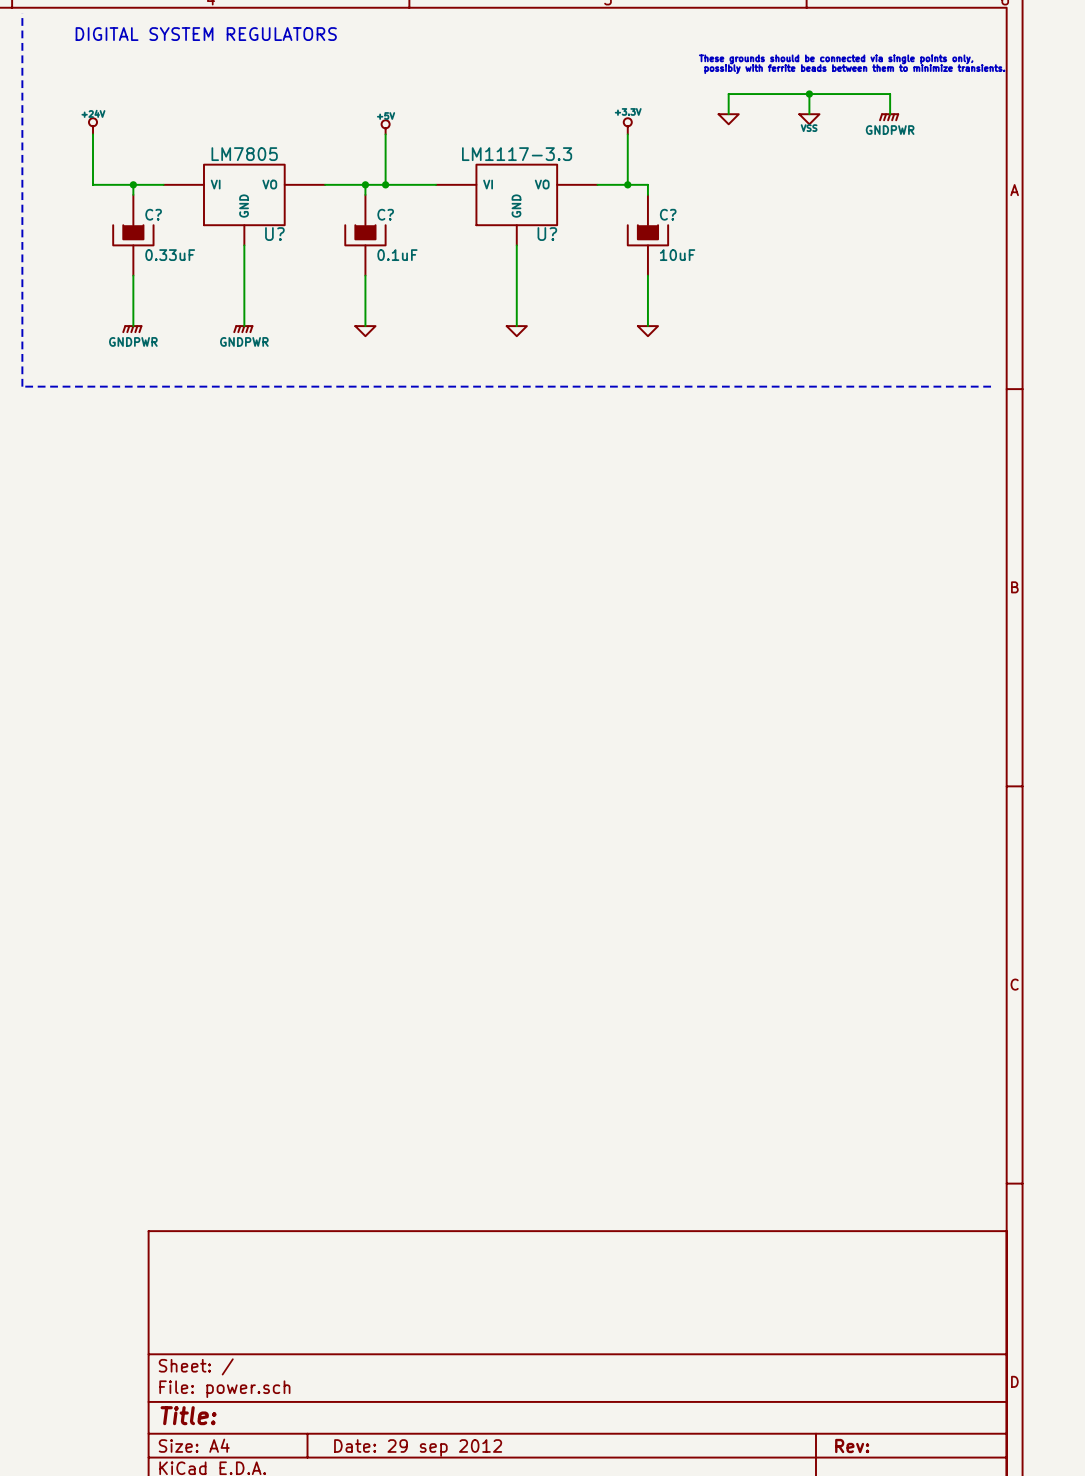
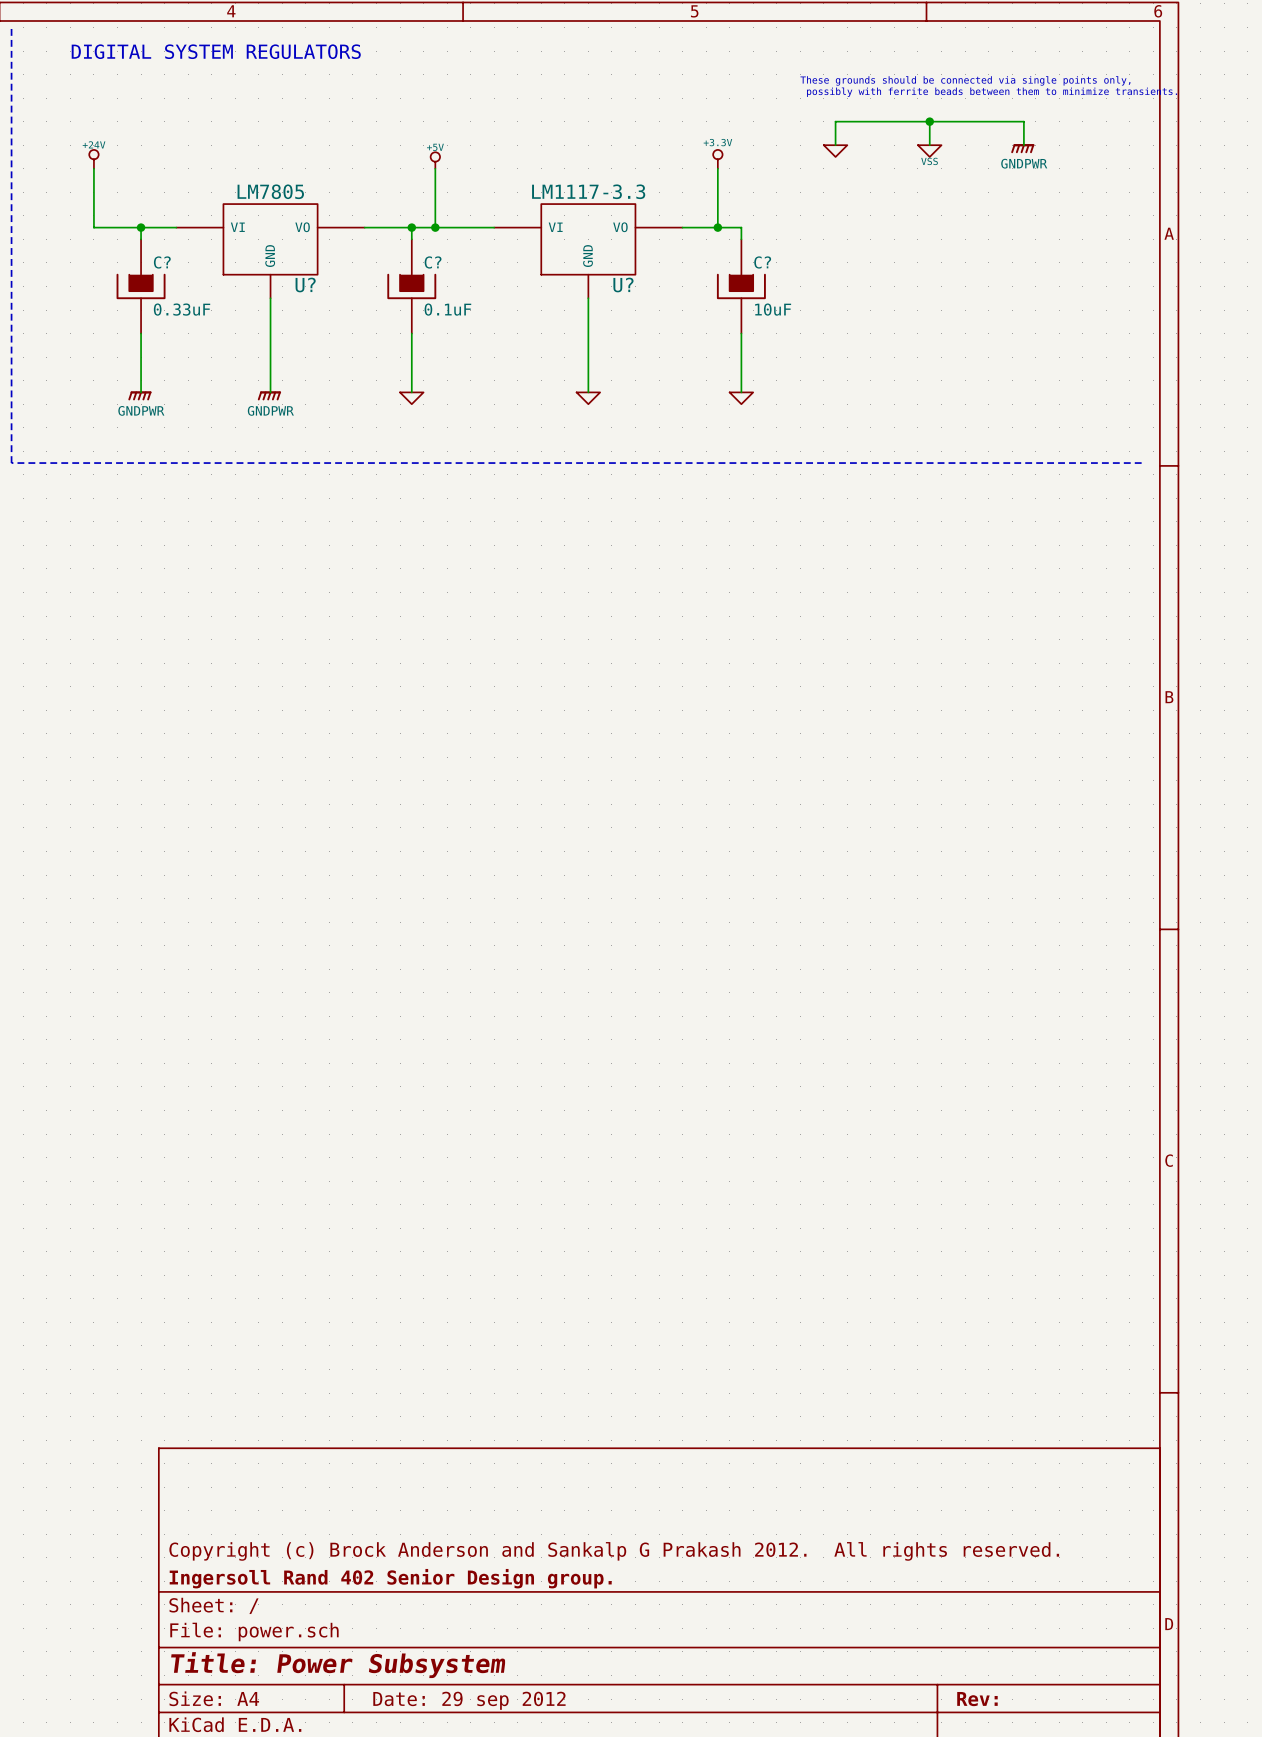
title block: none -> Copyright (c) Brock Anderson and Sankalp G Prakash 2012. All rights reserved. (614, 1551)
title block: none -> Ingersoll Rand 402 Senior Design group. (390, 1578)
title block: Title: (188, 1415) -> Title: Power Subsystem (338, 1665)

